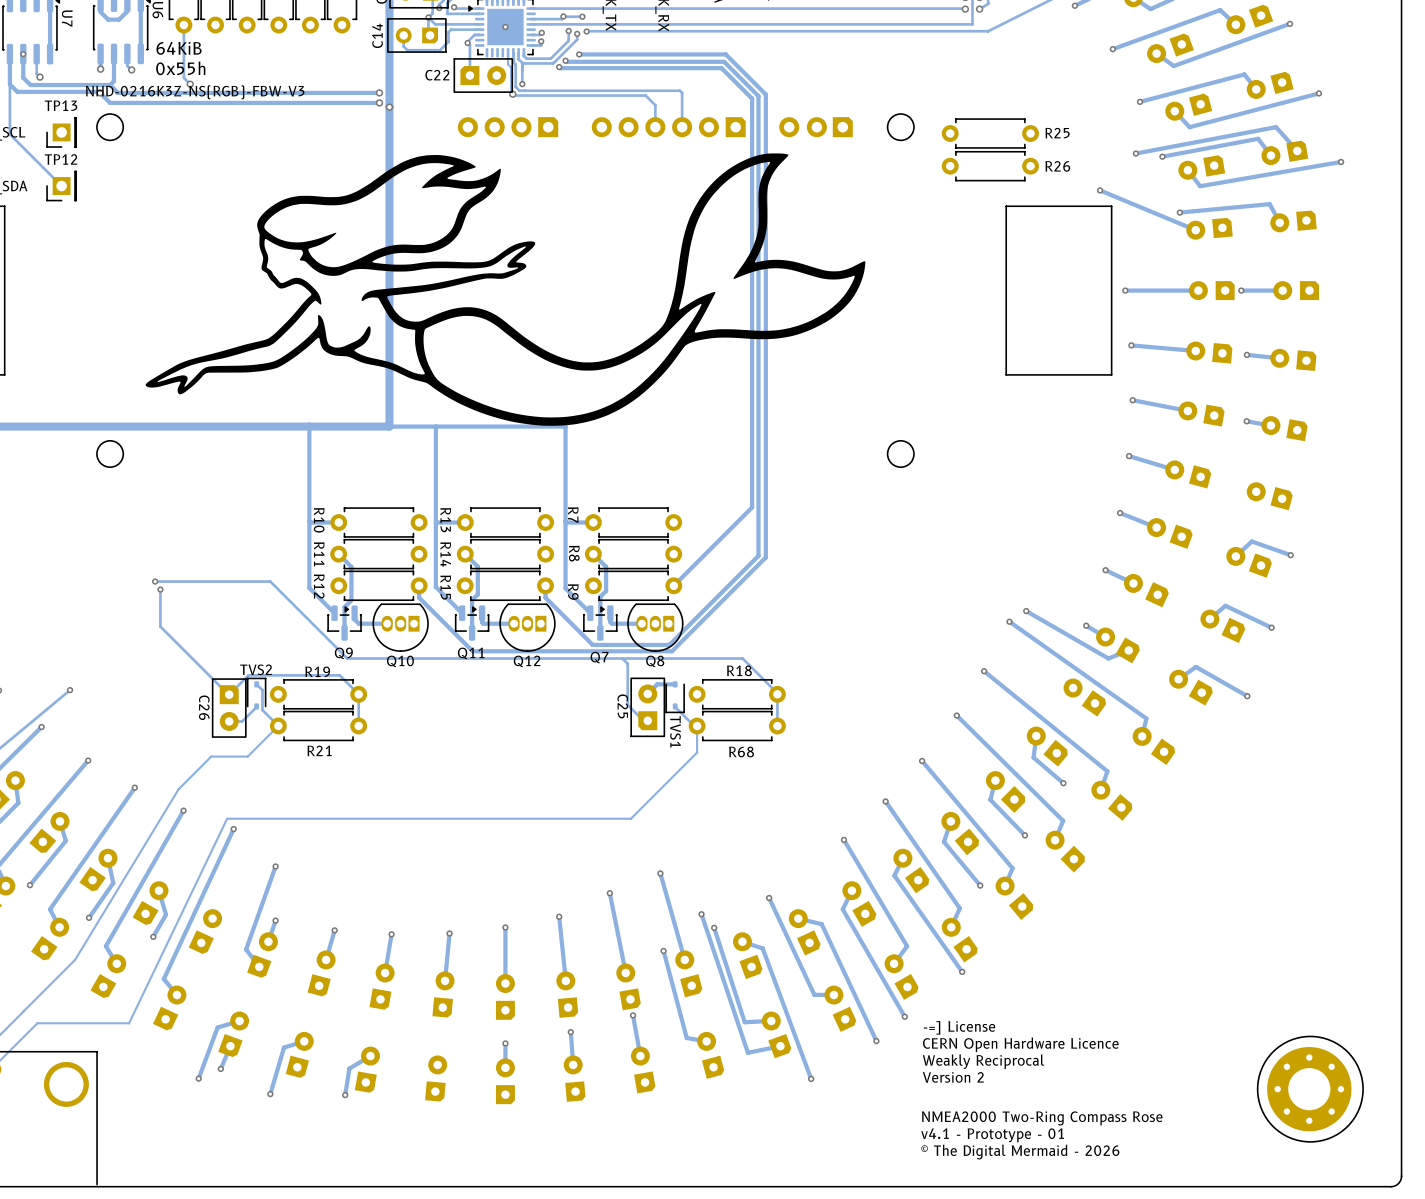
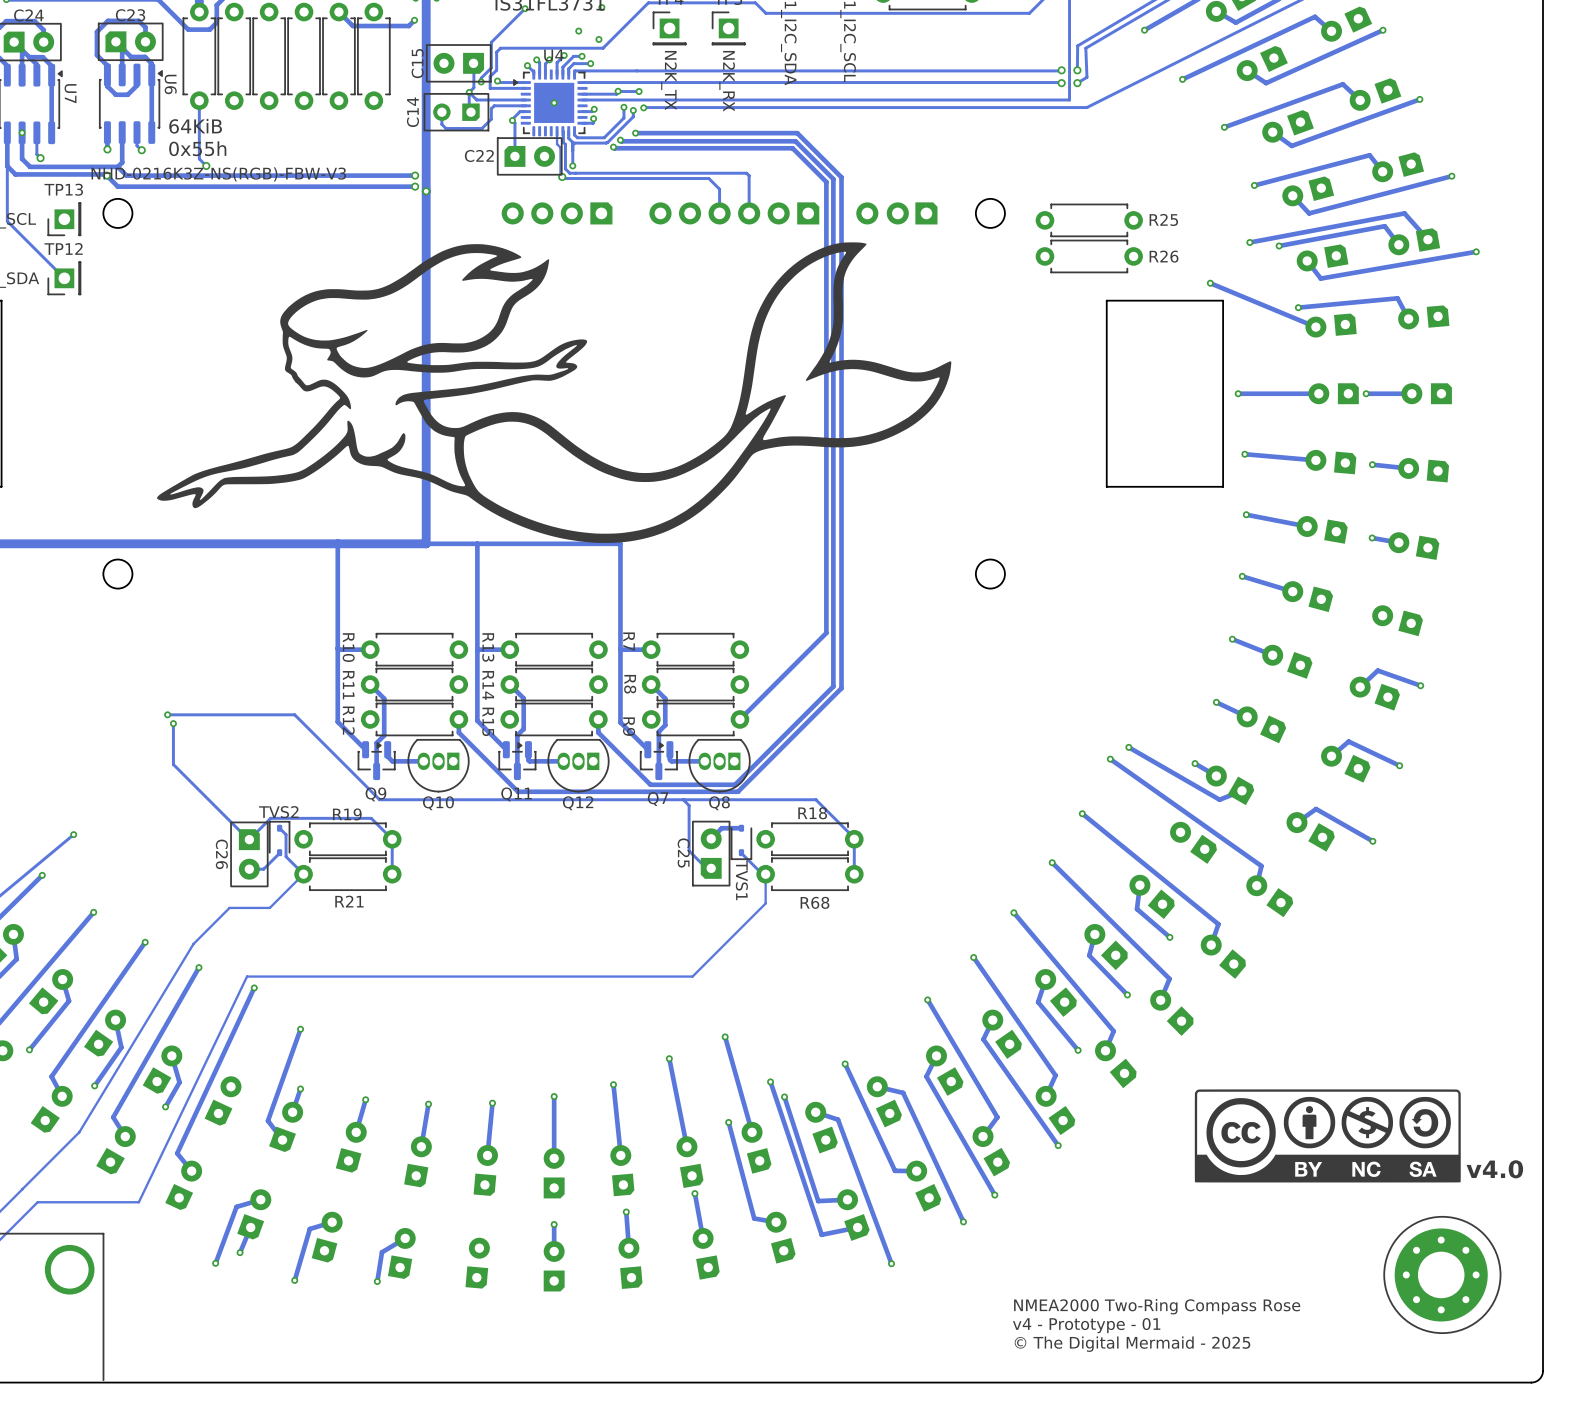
drawing: none -> [1194, 1089, 1461, 1183]
text: none -> v4.0 (1494, 1169)
text: -=] License (959, 1027) -> none
text: CERN Open Hardware Licence (1020, 1044) -> none
text: Weakly Reciprocal (983, 1061) -> none
text: Version 2 (953, 1077) -> none
text: v4.1 - Prototype - 01 (992, 1135) -> v4 - Prototype - 01 (1086, 1325)
text: © The Digital Mermaid - 2026 (1020, 1152) -> © The Digital Mermaid - 2025 (1132, 1344)

